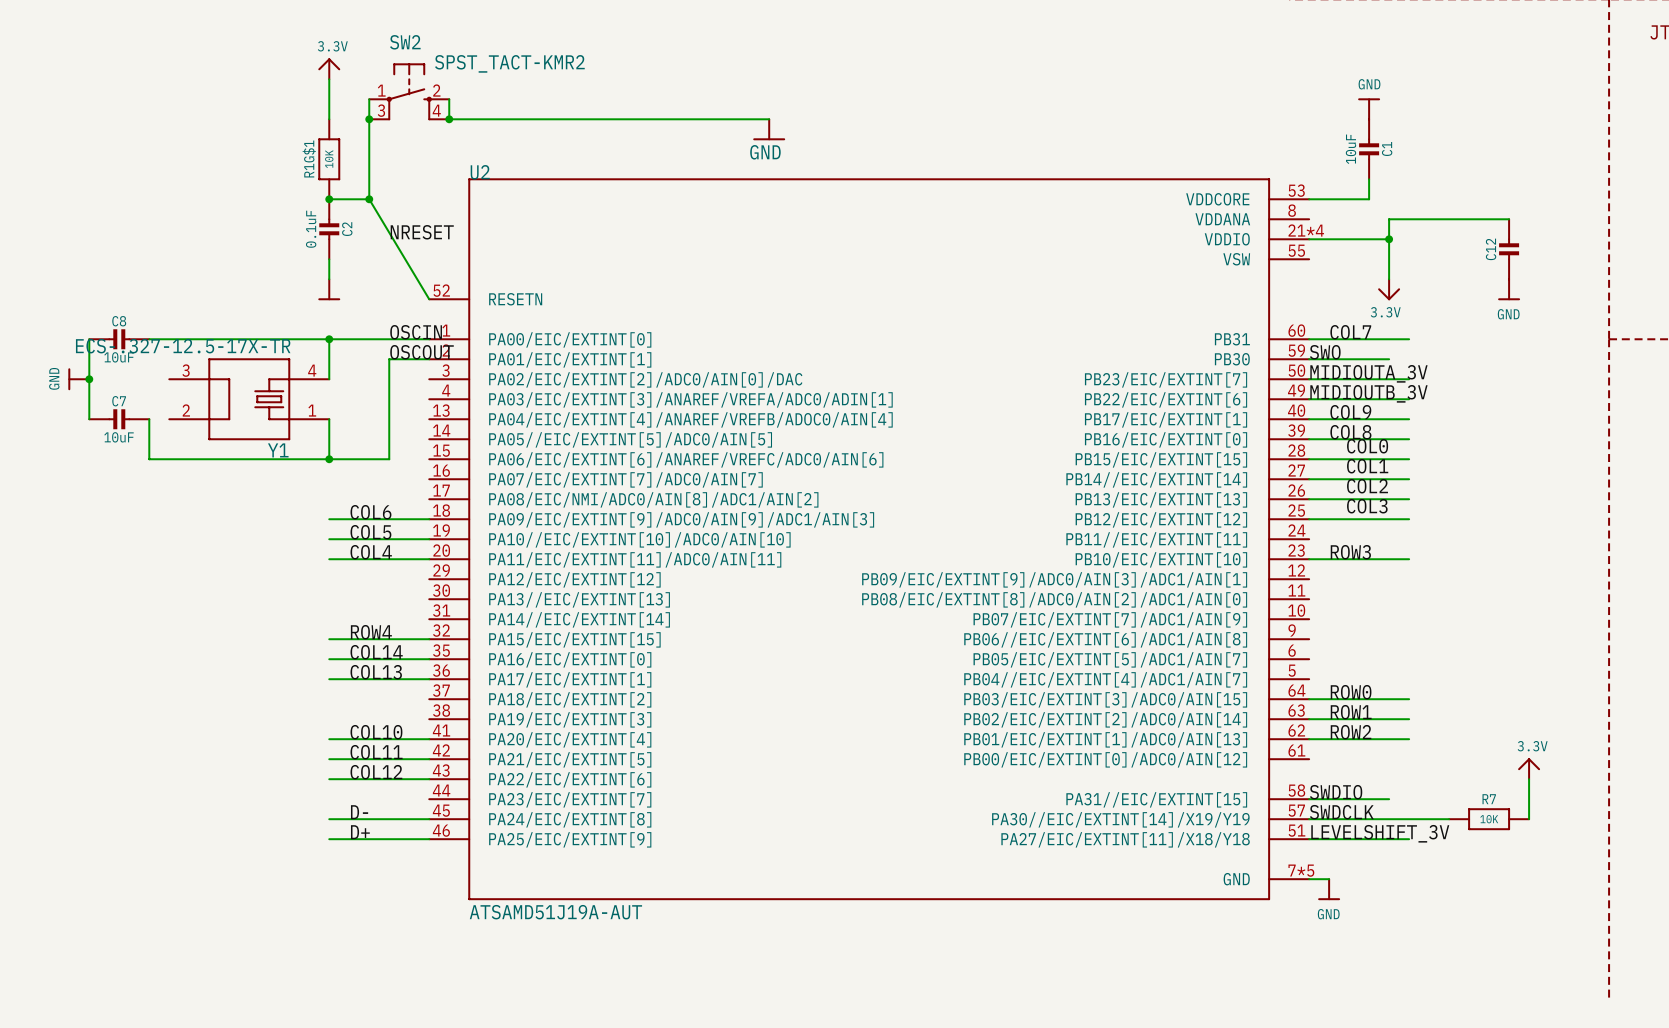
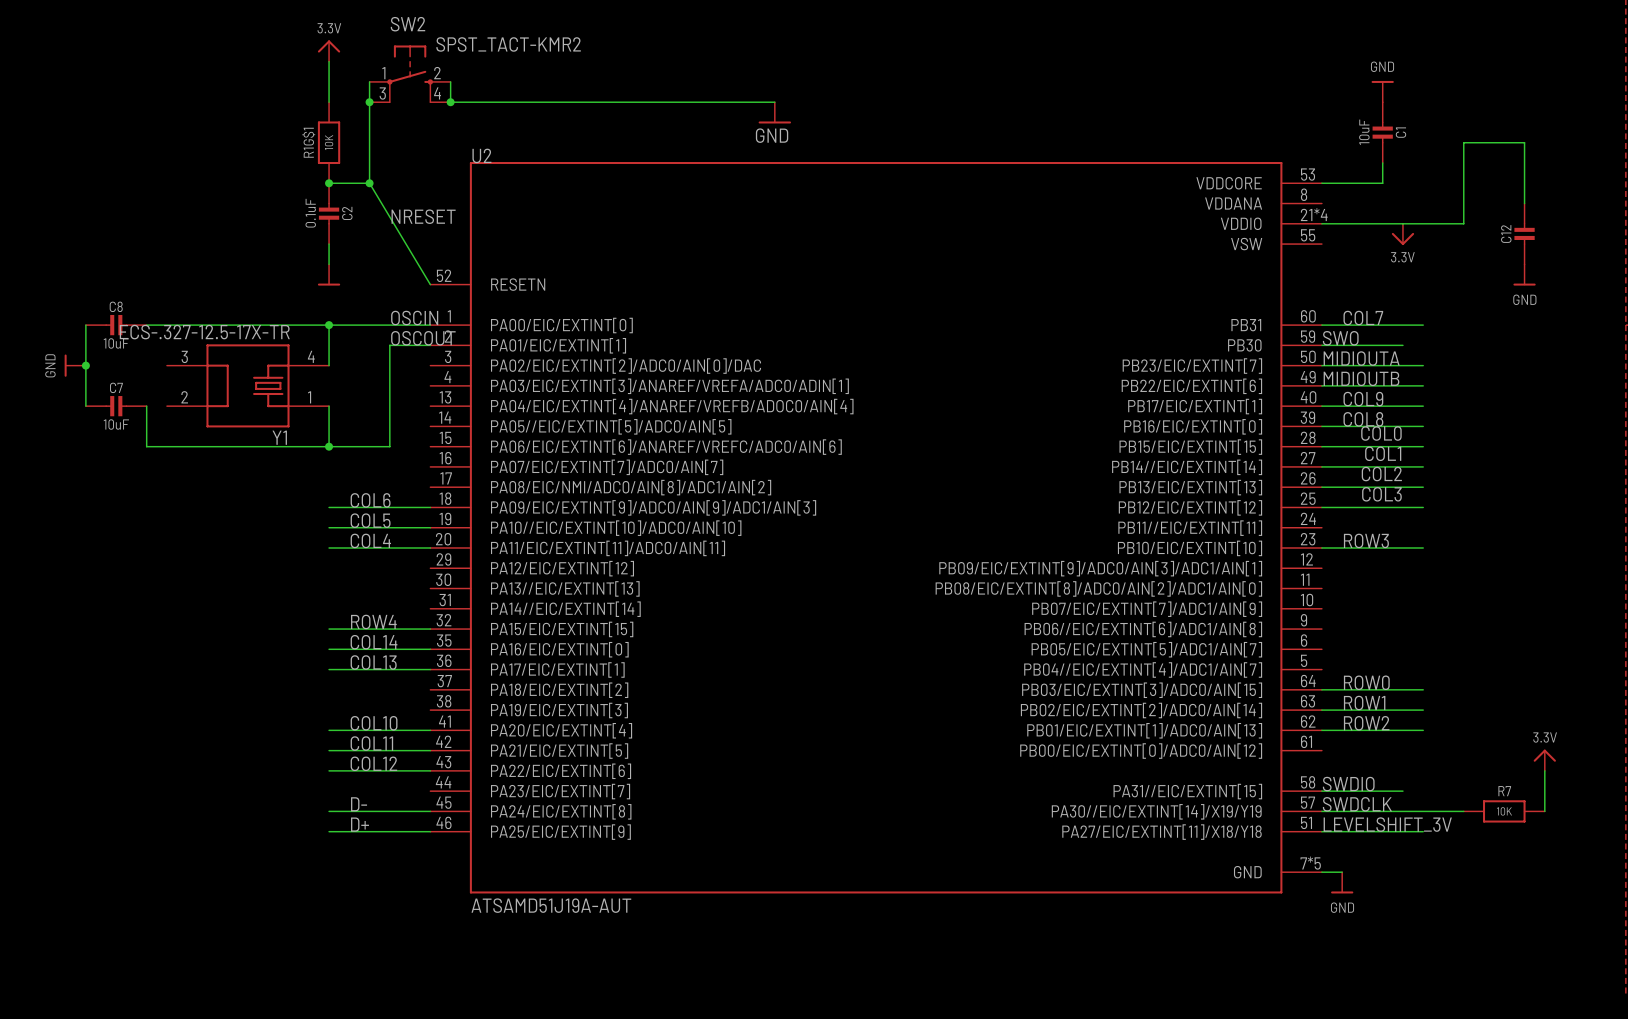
wire: (1509, 219) (1389, 219) (1389, 279) -> (1524, 203) (1524, 142) (1463, 142) (1463, 223) (1402, 223)
junction: (1389, 239) -> none
power symbol position: 3.3V (1389, 289) -> 3.3V (1402, 234)
label: MIDIOUTA_3V (1368, 373) -> MIDIOUTA (1361, 358)
label: MIDIOUTB_3V (1368, 393) -> MIDIOUTB (1361, 378)

